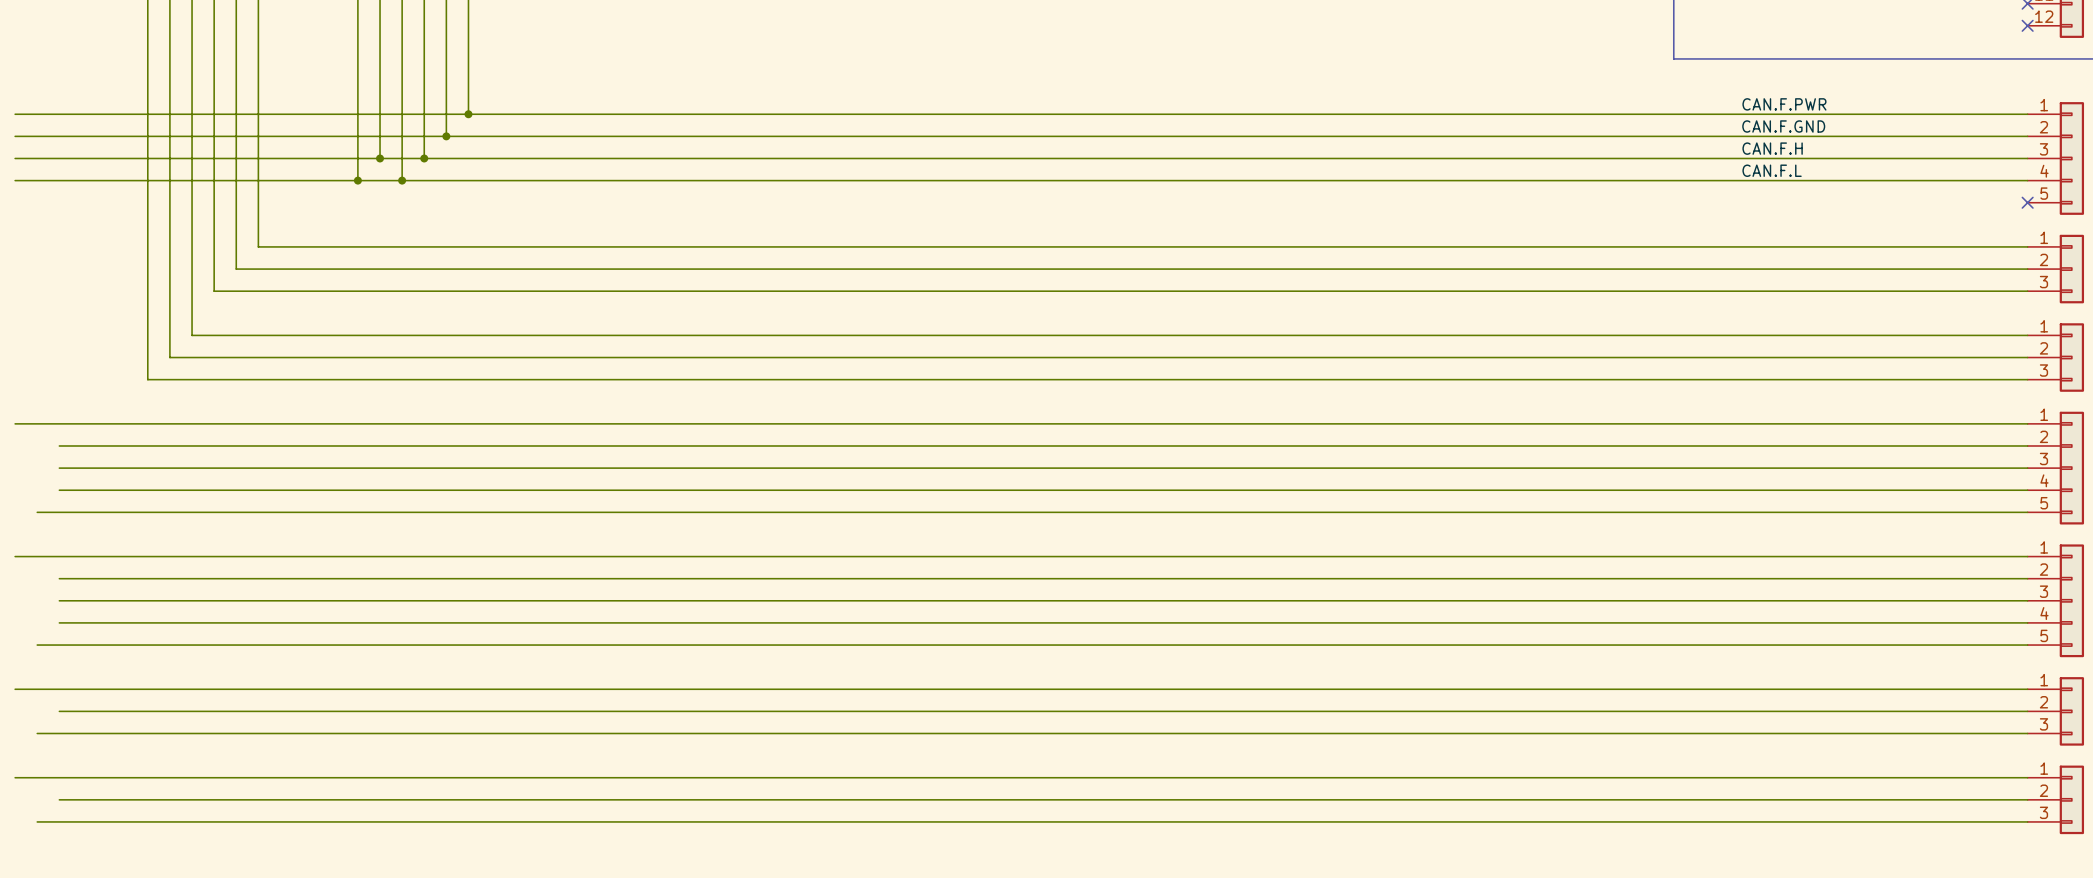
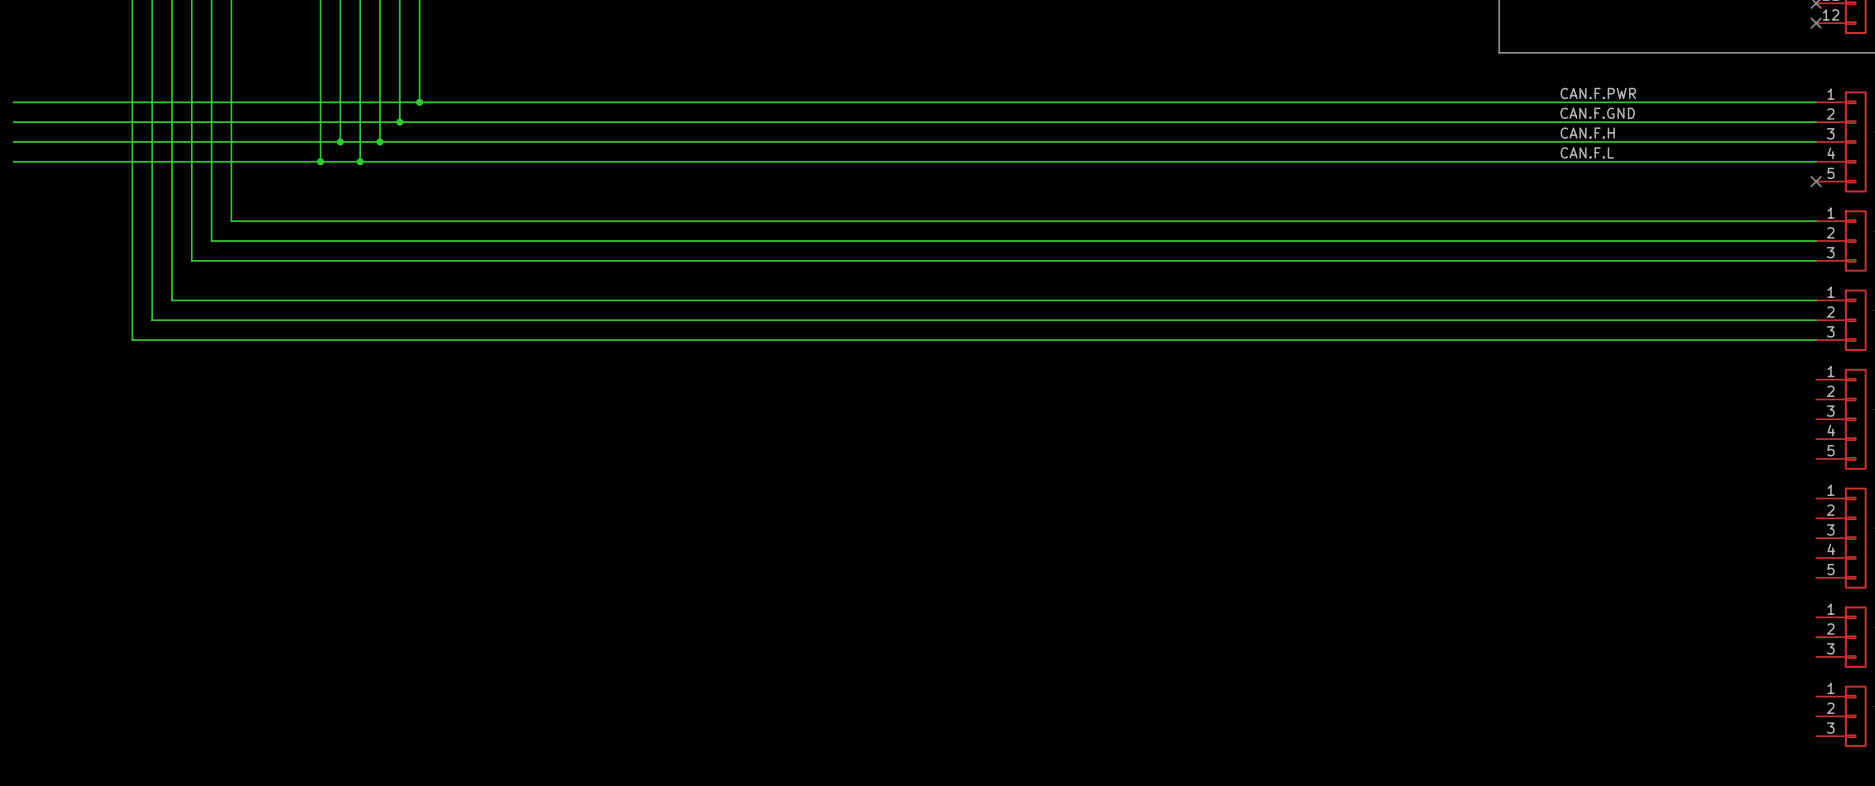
wire: (15, 423) (2027, 423) -> none
wire: (59, 445) (2027, 445) -> none
wire: (59, 468) (2027, 468) -> none
wire: (59, 490) (2027, 490) -> none
wire: (37, 512) (2027, 512) -> none
wire: (15, 556) (2027, 556) -> none
wire: (59, 578) (2027, 578) -> none
wire: (59, 600) (2027, 600) -> none
wire: (59, 622) (2027, 622) -> none
wire: (37, 645) (2027, 645) -> none
wire: (15, 689) (2027, 689) -> none
wire: (59, 711) (2027, 711) -> none
wire: (37, 733) (2027, 733) -> none
wire: (15, 777) (2027, 777) -> none
wire: (59, 799) (2027, 799) -> none
wire: (37, 821) (2027, 821) -> none

